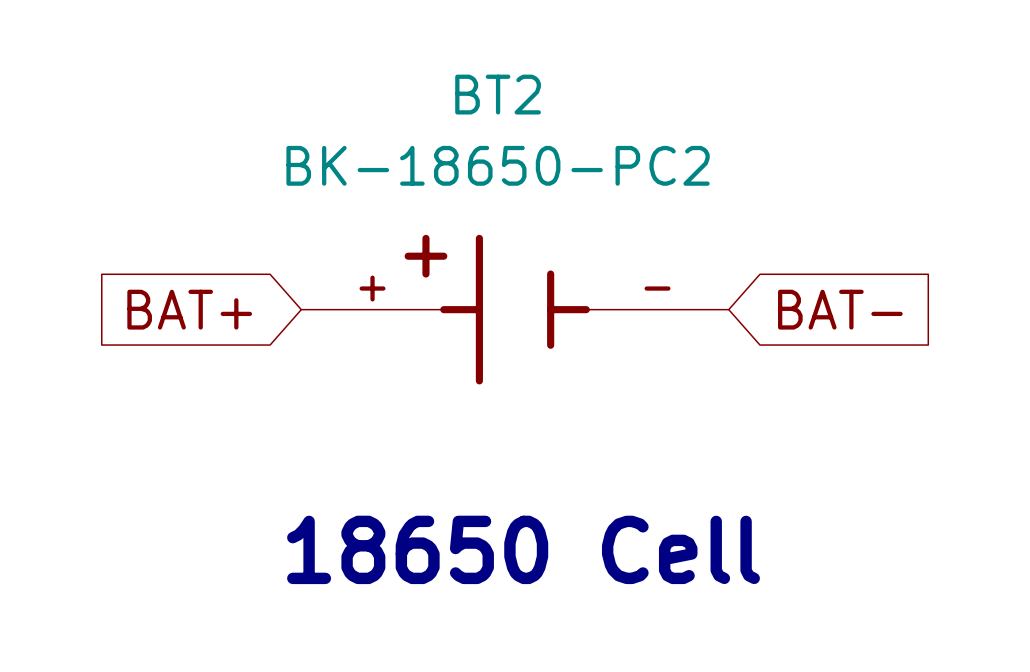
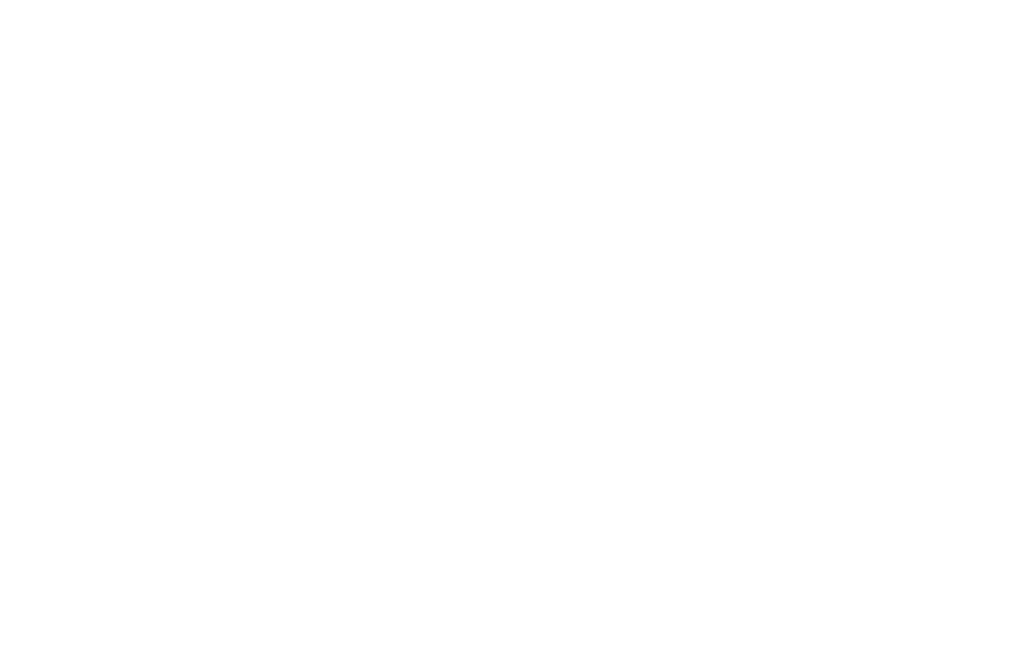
global label: BAT+ (189, 309) -> none
BT2: BK-18650-PC2 (515, 309) -> none
global label: BAT- (840, 309) -> none
text: 18650 Cell (523, 549) -> none

